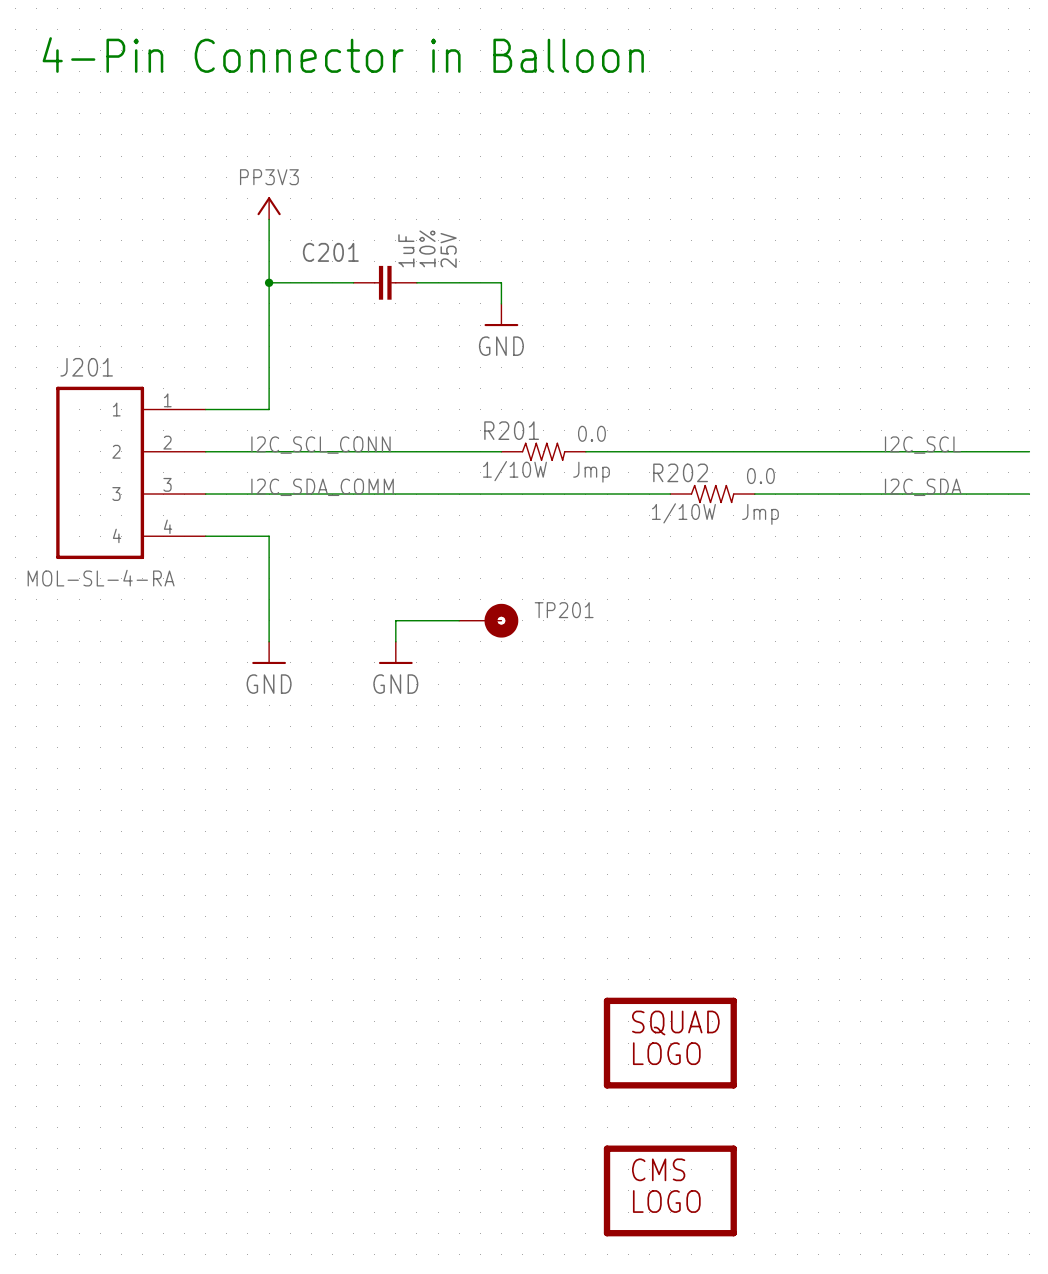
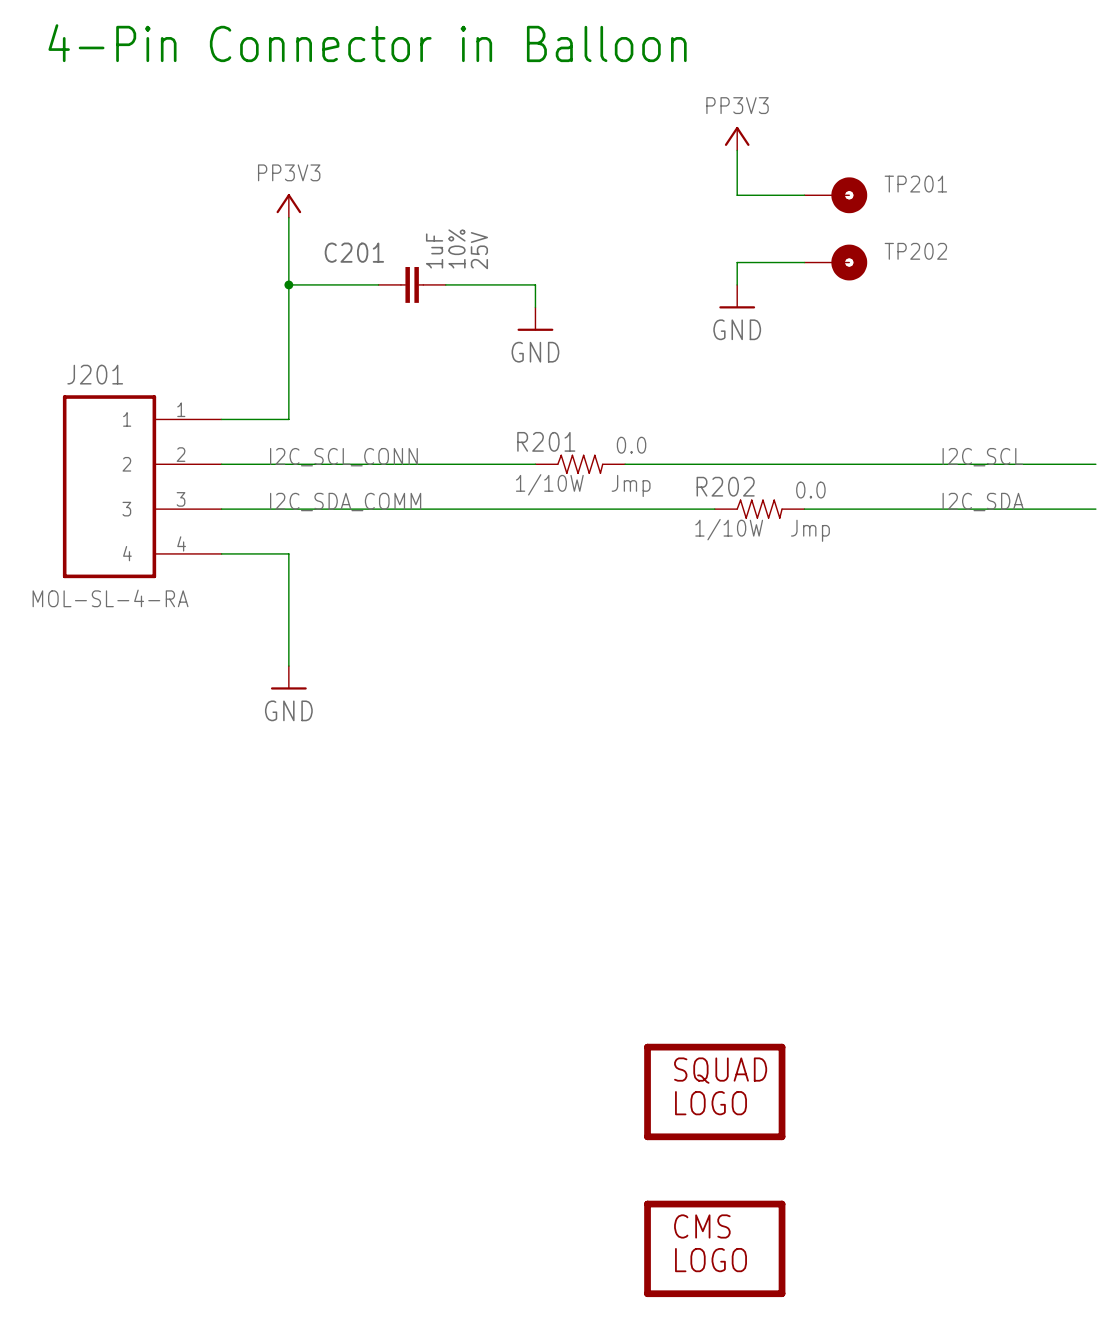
power symbol: none -> PP3V3 (737, 138)
wire: none -> (737, 150) (737, 195) (804, 195)
wire: none -> (804, 262) (737, 262) (737, 284)
TP202: none -> (835, 262)
power symbol: none -> GND (737, 296)
wire: (459, 620) (395, 620) (395, 641) -> none
TP201 position: (488, 620) -> (835, 195)
power symbol: GND (395, 652) -> none

